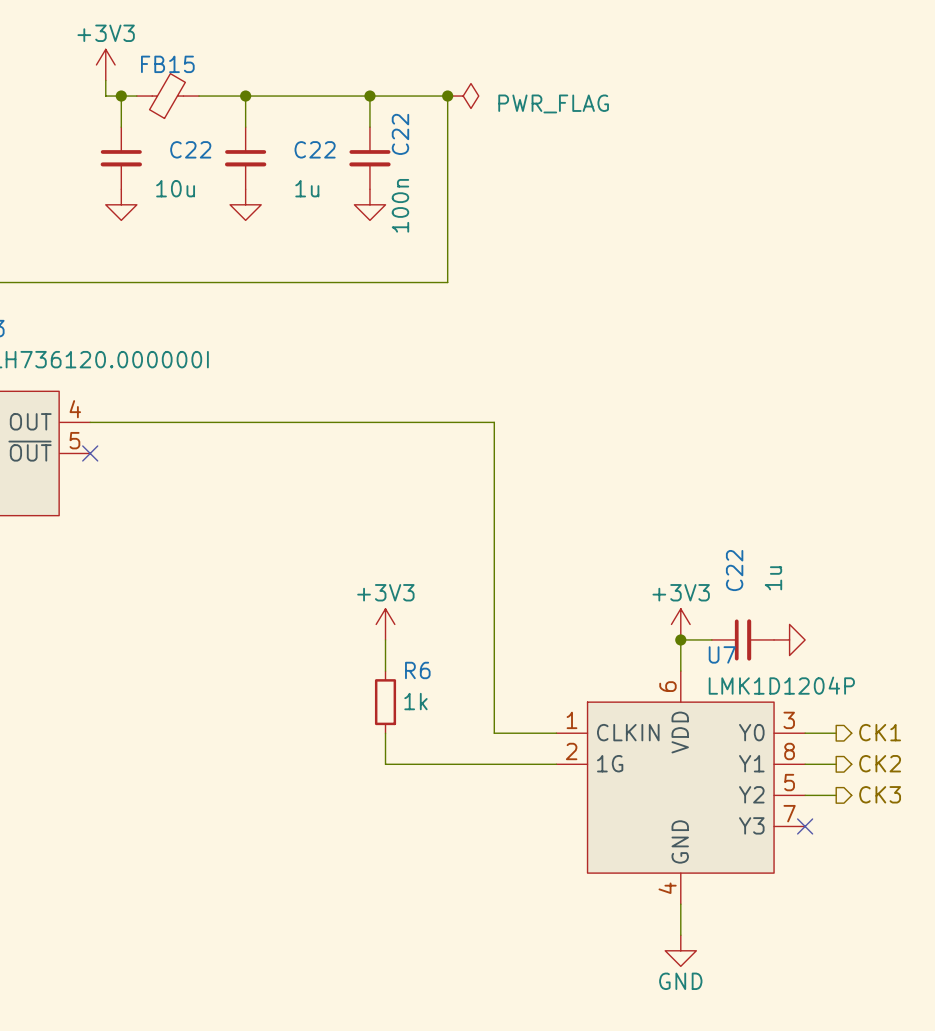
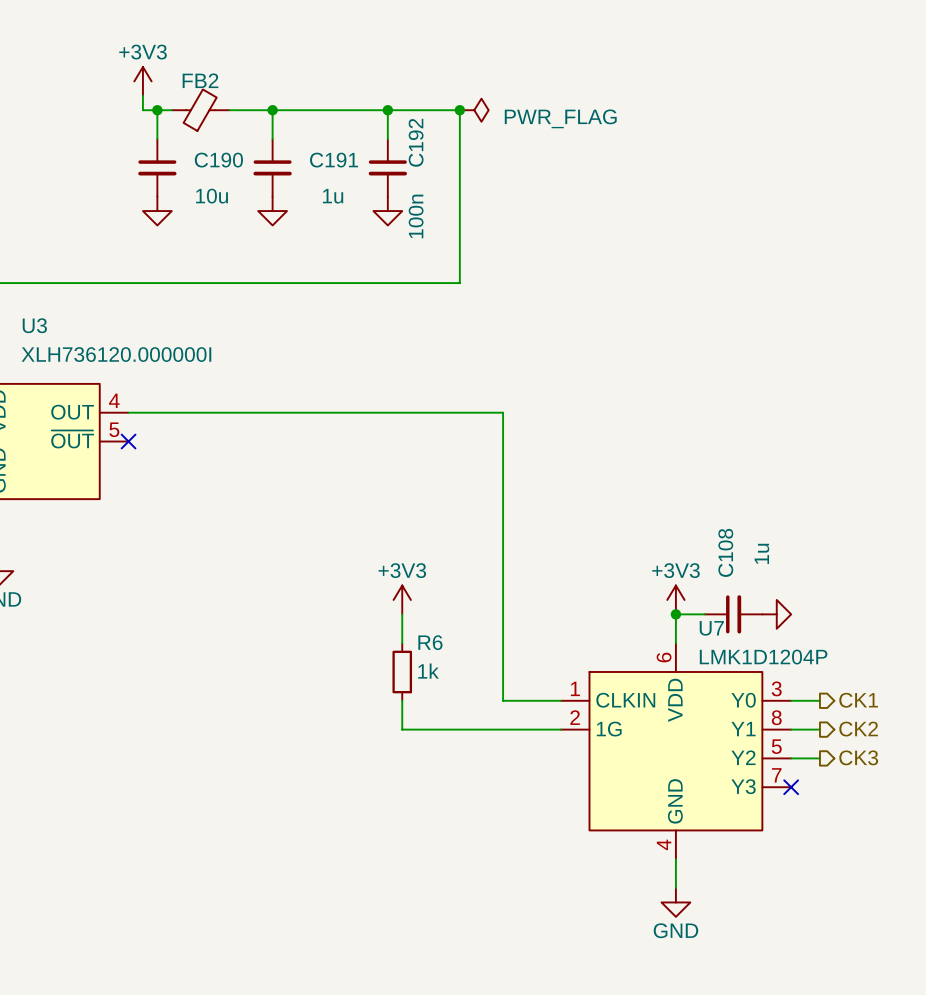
FB15 name: FB15 (167, 64) -> FB2 (200, 80)
C22 name: C22 (400, 134) -> C192 (416, 142)
C22 name: C22 (190, 149) -> C190 (218, 160)
C22 name: C22 (315, 149) -> C191 (334, 160)
C22 name: C22 (734, 570) -> C108 (725, 552)

